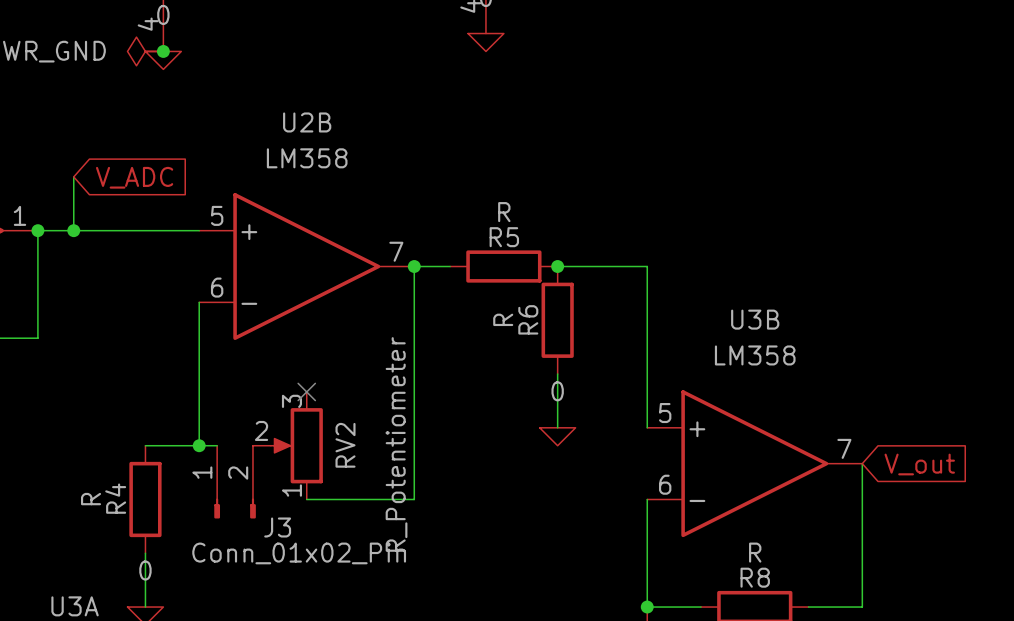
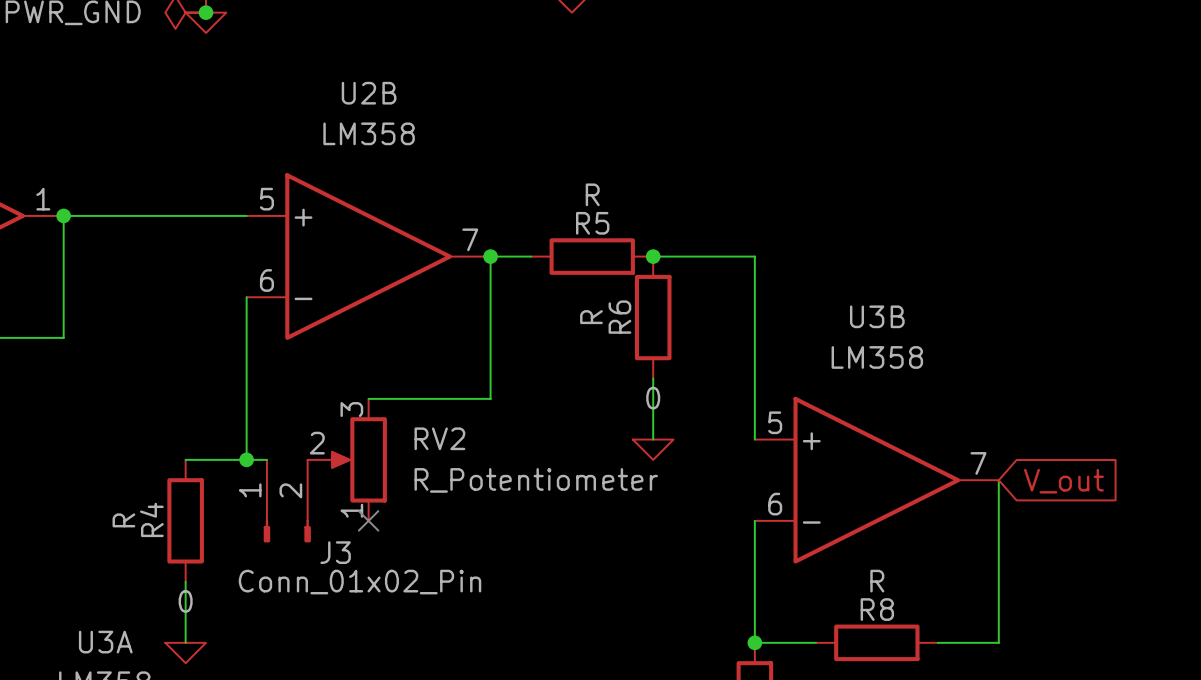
wire: (73, 176) (73, 230) -> none
global label: V_ADC (134, 177) -> none
junction: (73, 230) -> none
no-connect mark: (306, 391) -> none
wire: (414, 391) (414, 499) (306, 499) -> (490, 398) (368, 398)
RV2 value rotation: 0° (396, 444) -> 90° clockwise (536, 480)
RV2 name rotation: 0° (345, 445) -> 90° clockwise (439, 438)
no-connect mark: none -> (368, 520)

